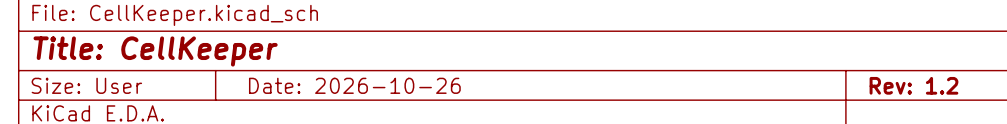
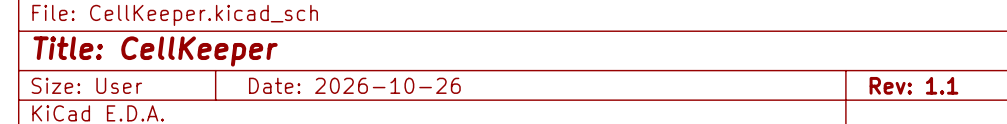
title block: Rev: 1.2 (913, 85) -> Rev: 1.1 (913, 85)

